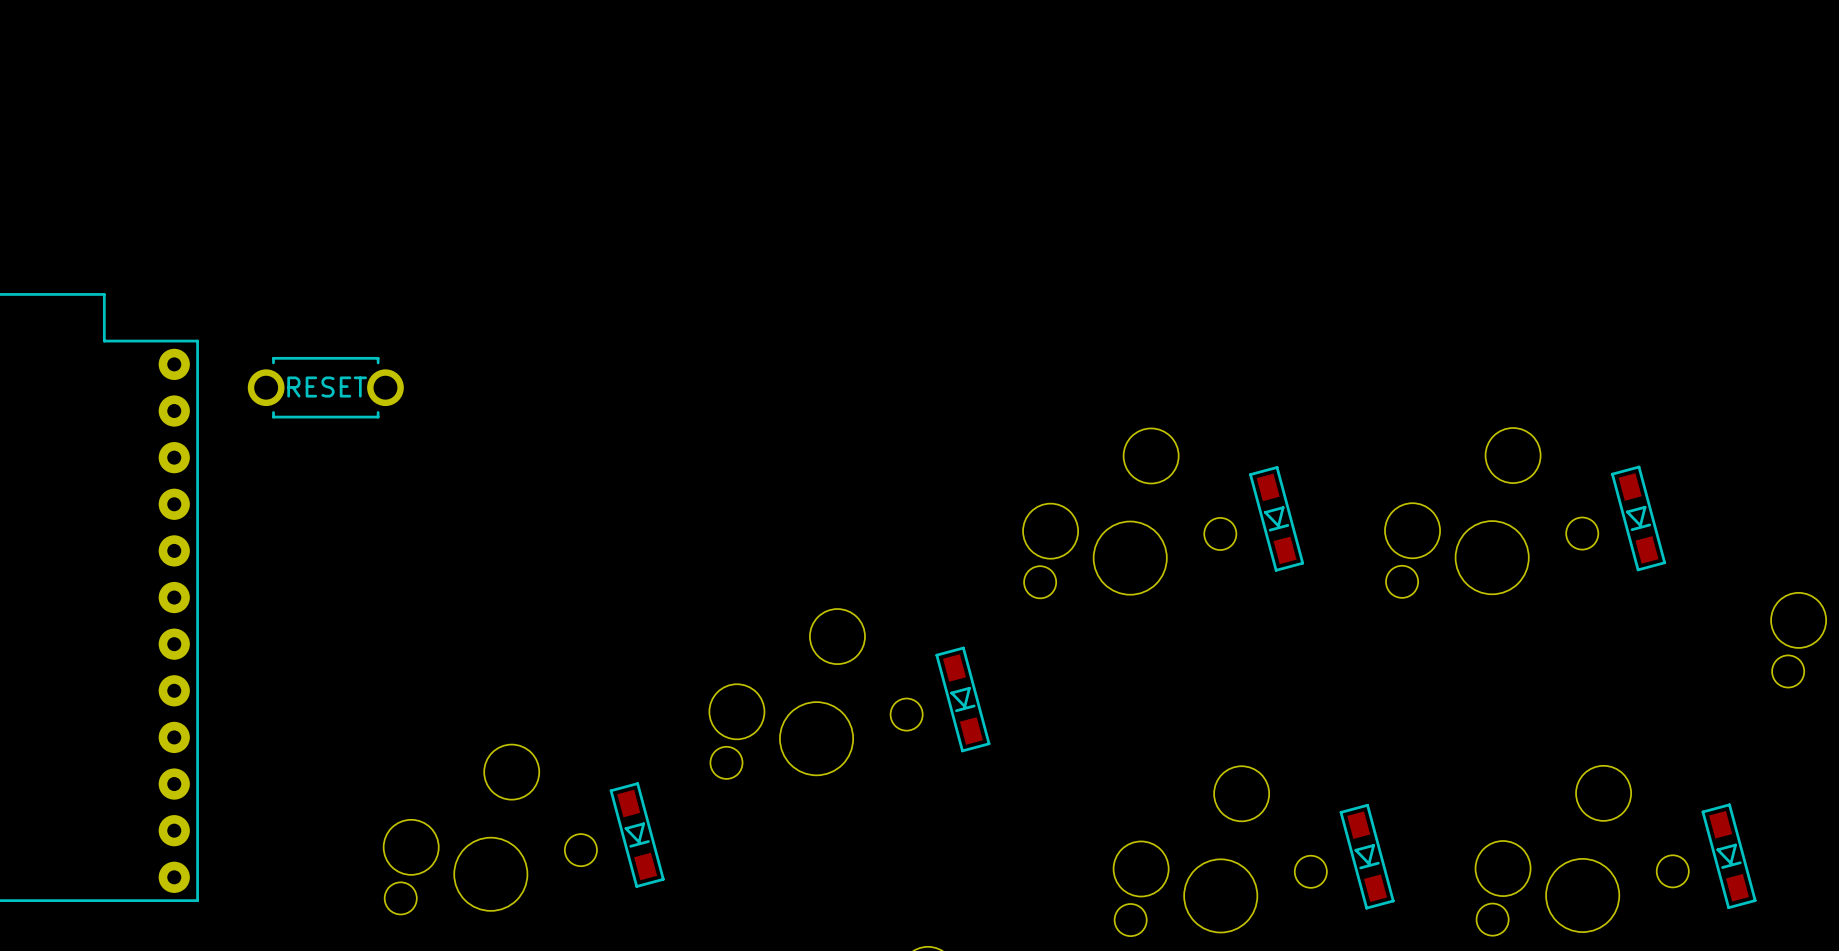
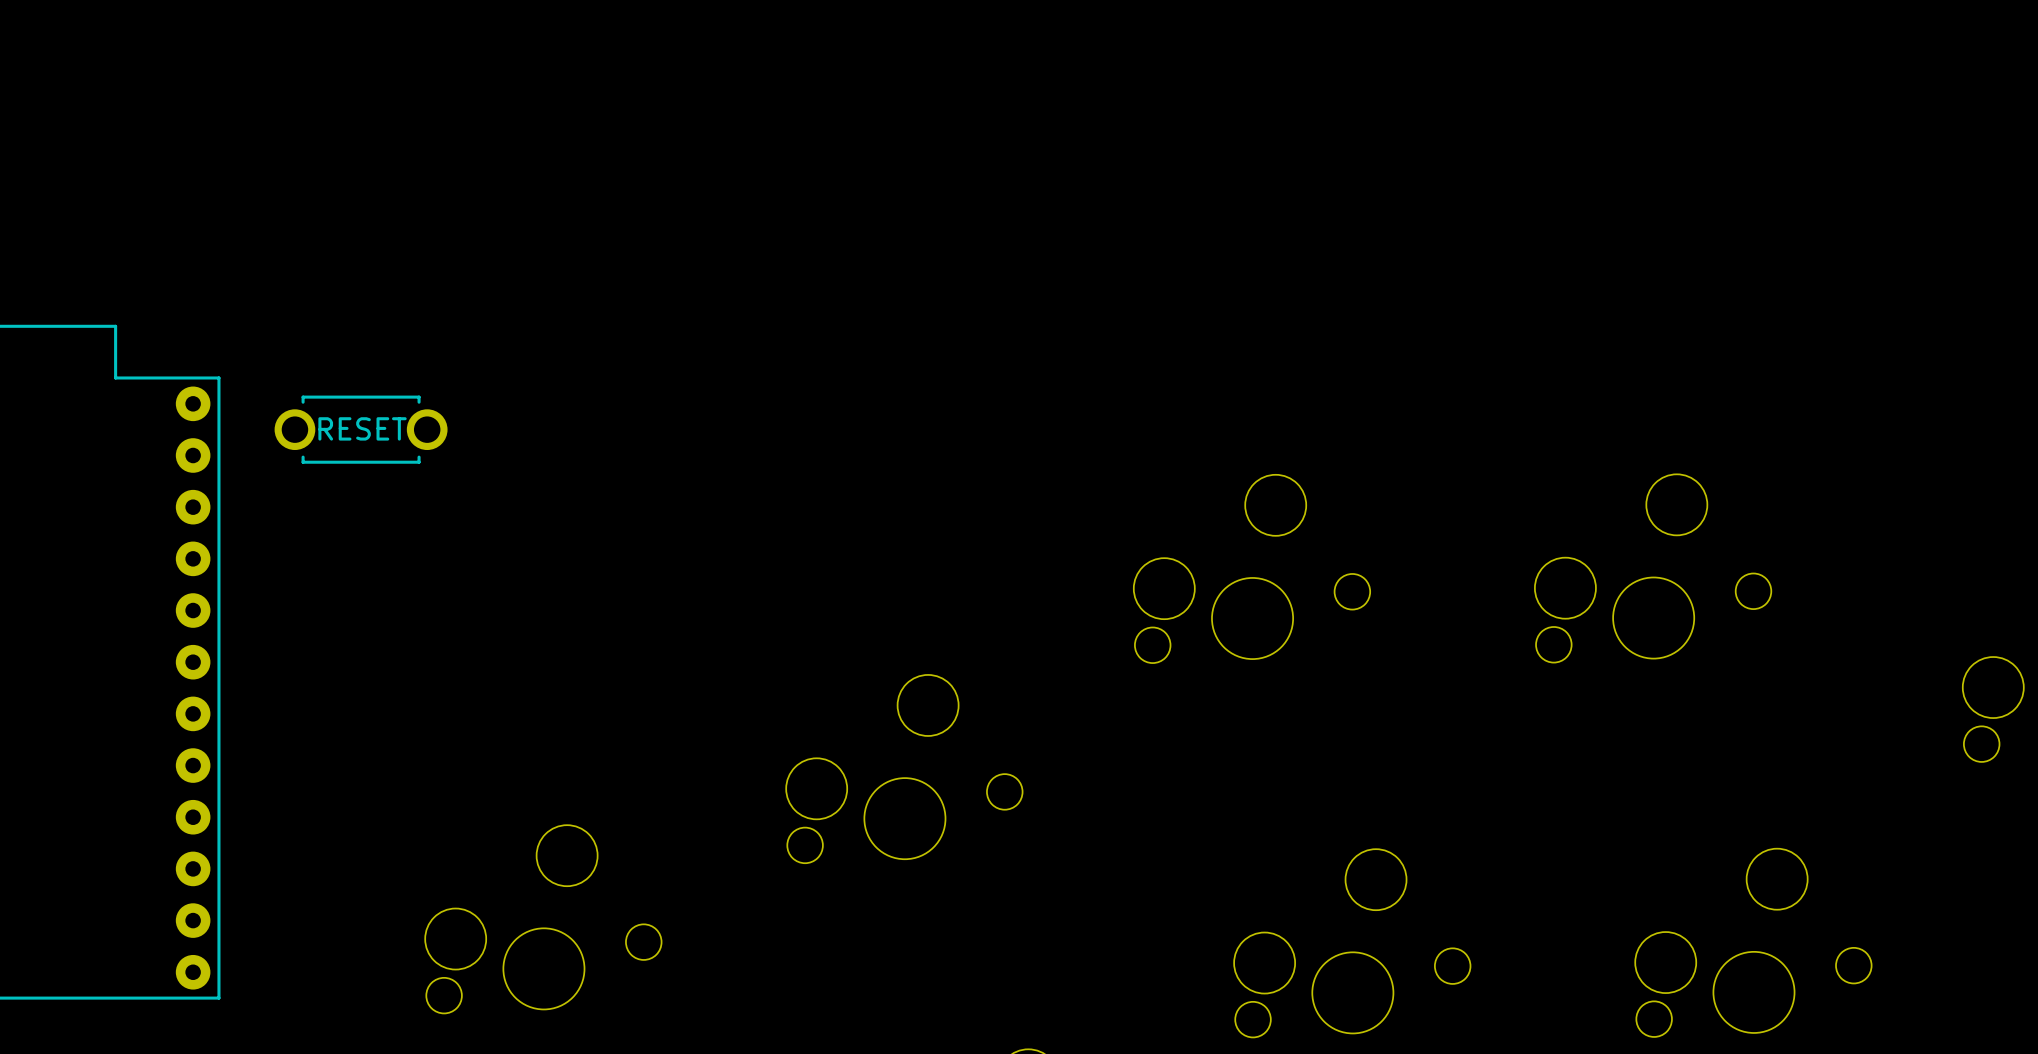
part: (1276, 518) -> none
part: (1638, 518) -> none
part: (962, 699) -> none
part: (637, 835) -> none
part: (1367, 856) -> none
part: (1729, 856) -> none

